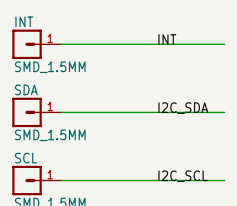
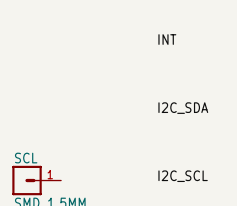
INT: SMD_1.5MM (36, 44) -> none
wire: (61, 44) (224, 44) -> none
SDA: SMD_1.5MM (36, 112) -> none
wire: (61, 112) (224, 112) -> none
wire: (61, 180) (224, 180) -> none

